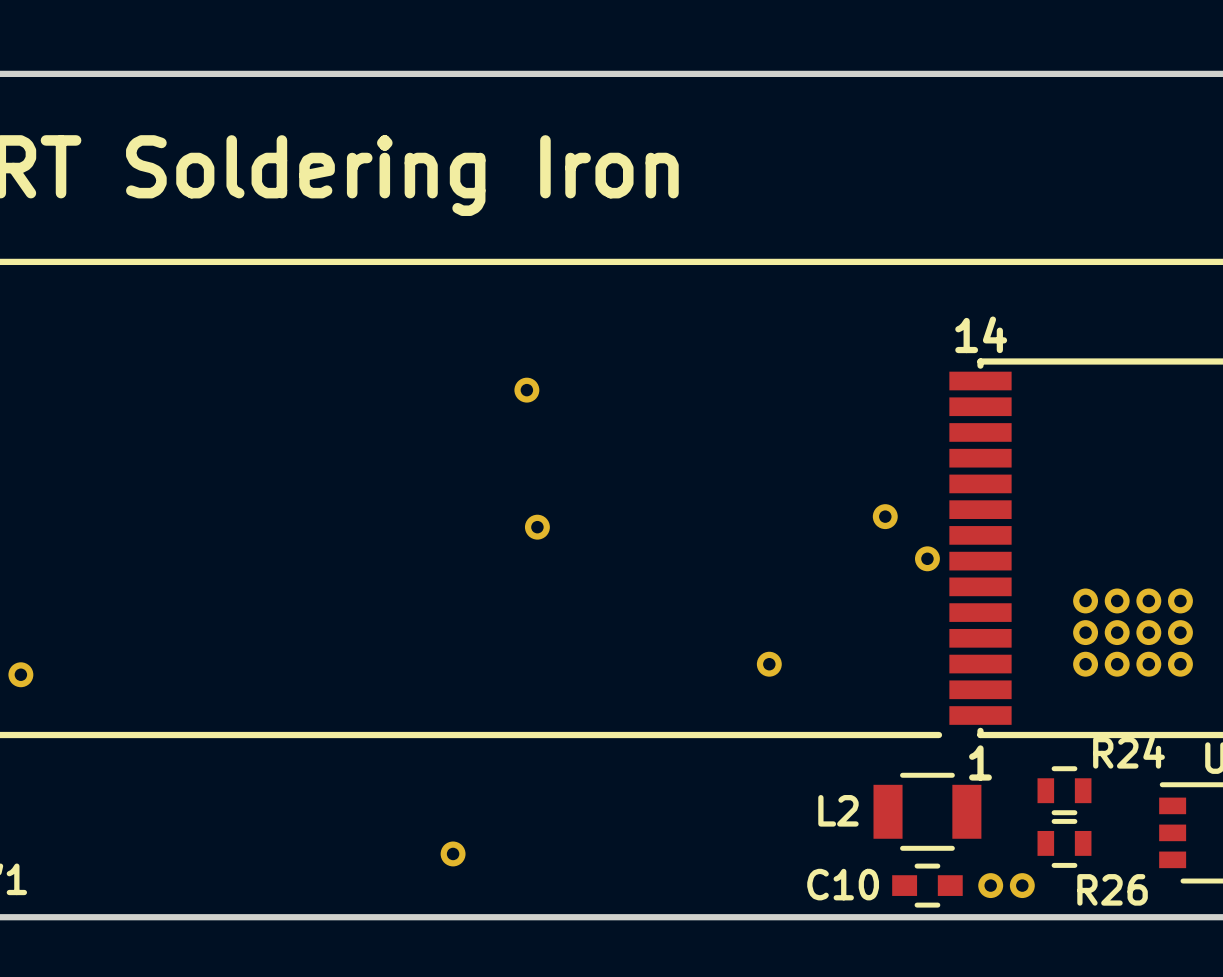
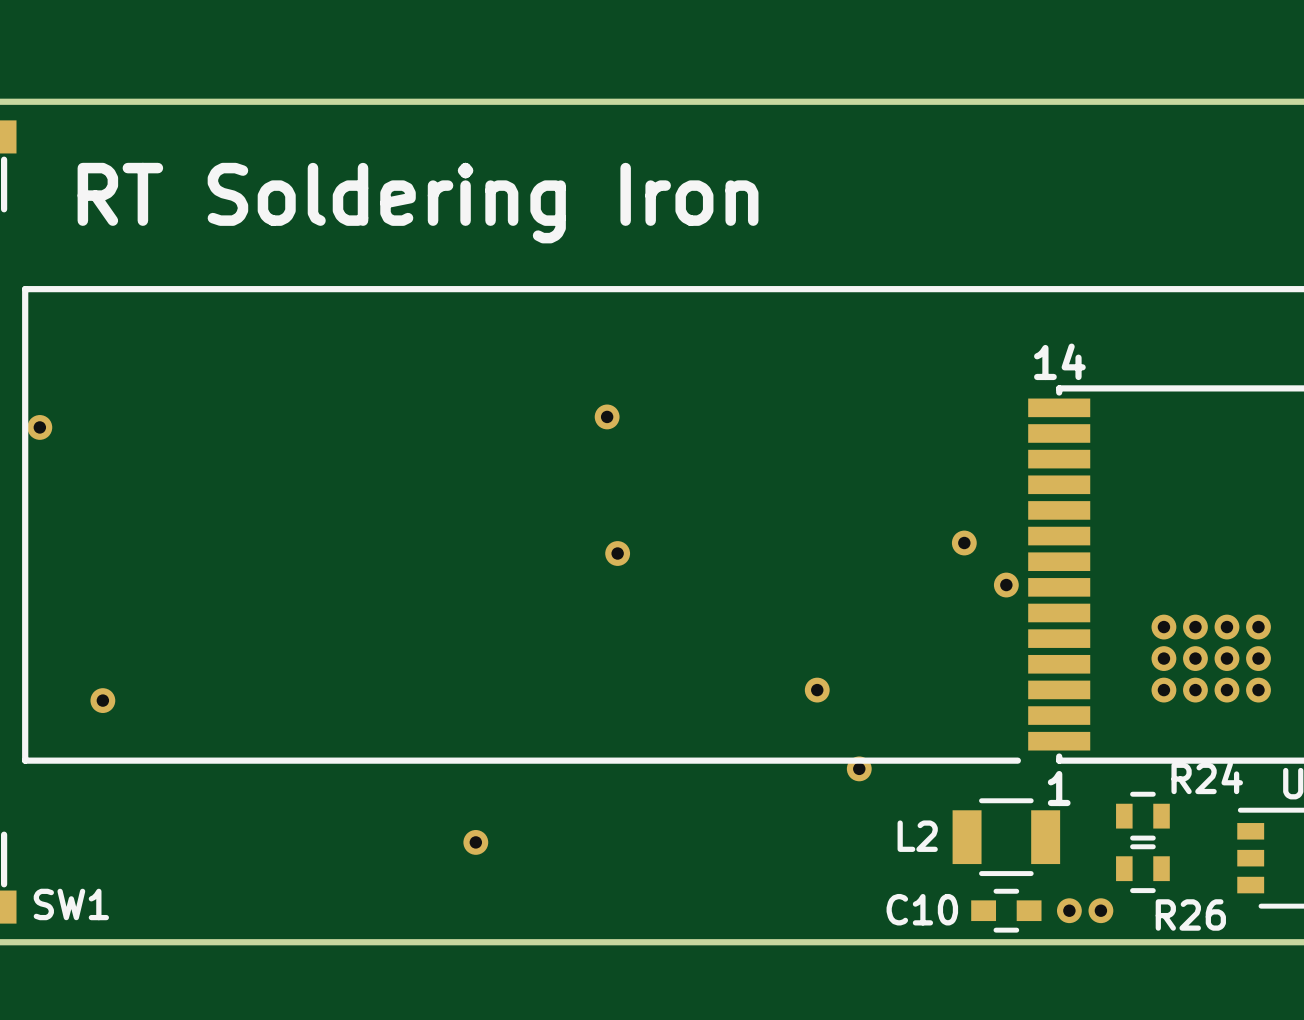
part position: (769, 664) -> (817, 690)
part: none -> (859, 768)
part position: (453, 853) -> (475, 842)

